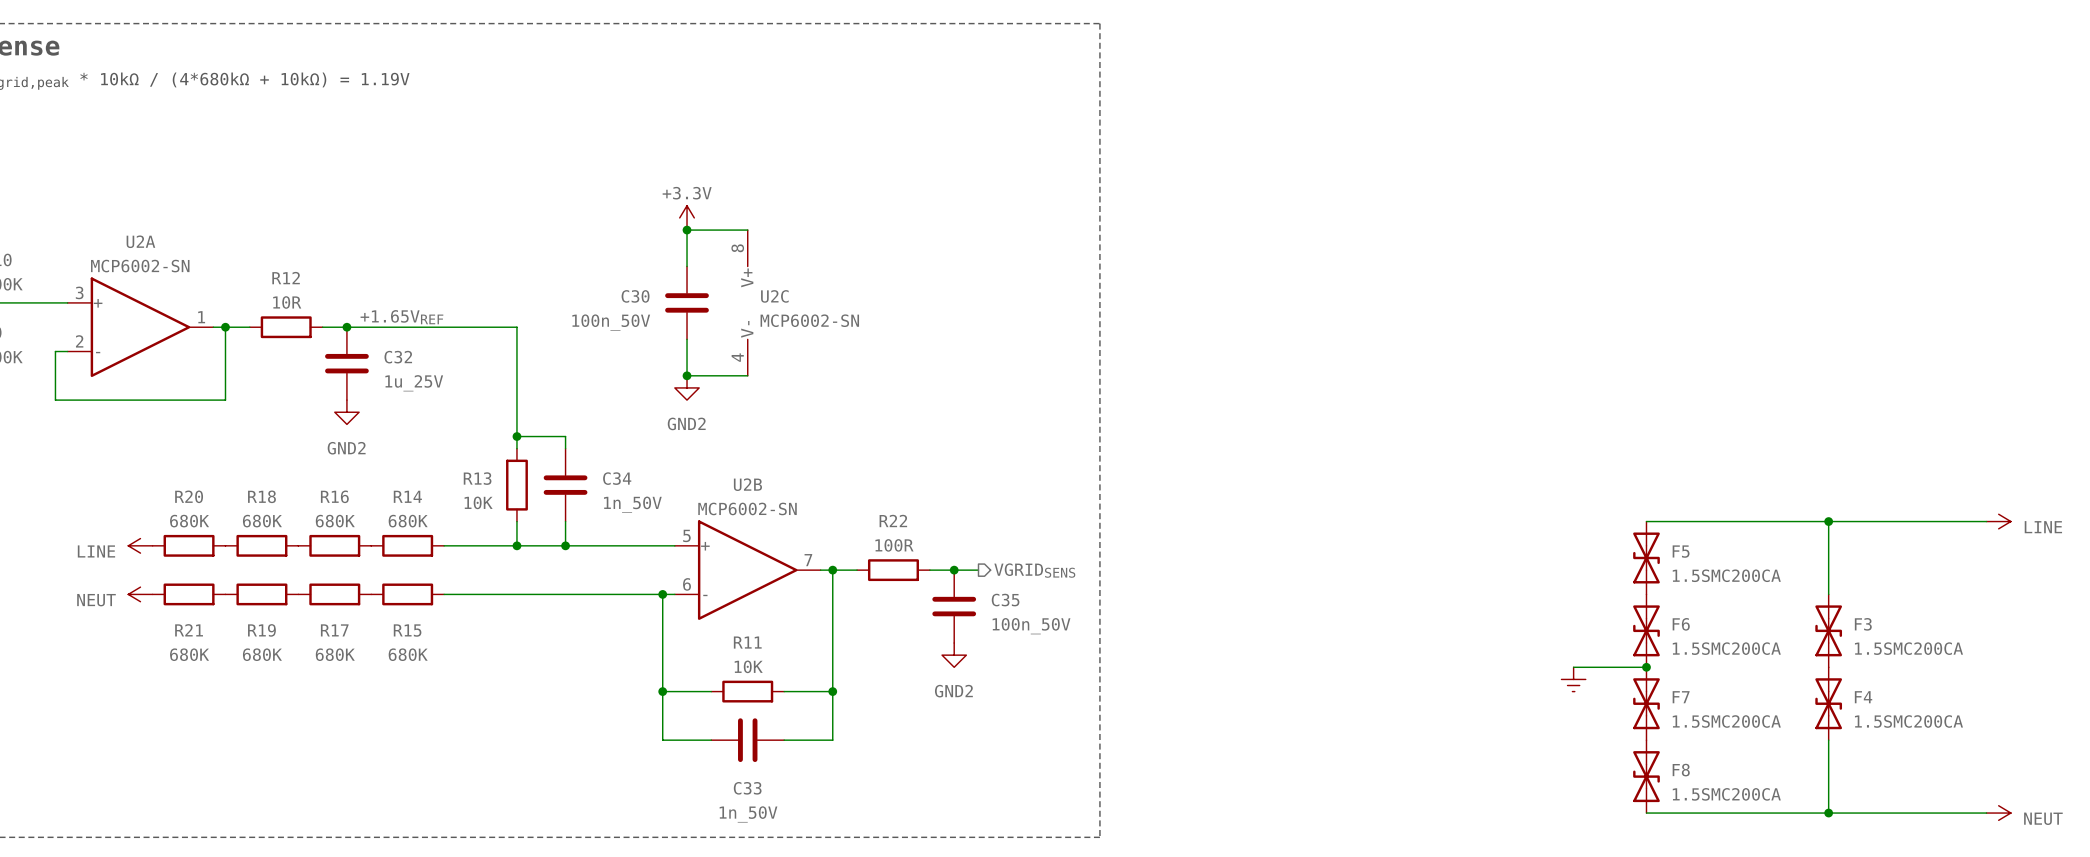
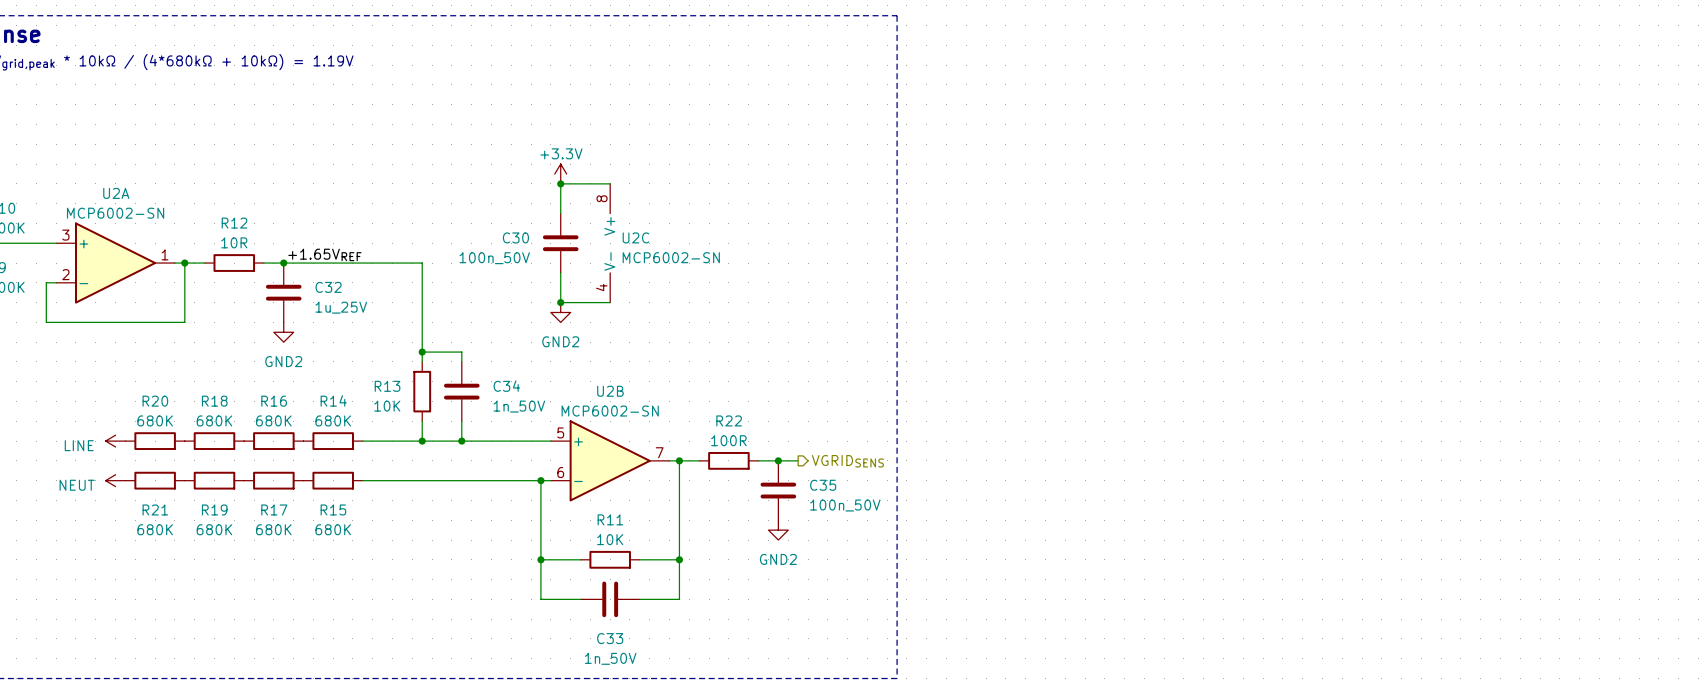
wire: (1646, 521) (1986, 521) -> none
wire: (1828, 521) (1828, 594) -> none
junction: (1828, 521) -> none
power symbol: LINE (1998, 521) -> none
F5: 1.5SMC200CA (1646, 557) -> none
F6: 1.5SMC200CA (1646, 630) -> none
F3: 1.5SMC200CA (1828, 630) -> none
wire: (1573, 667) (1646, 667) -> none
junction: (1646, 667) -> none
power symbol: (1573, 679) -> none
F7: 1.5SMC200CA (1646, 703) -> none
F4: 1.5SMC200CA (1828, 703) -> none
wire: (1828, 740) (1828, 813) -> none
F8: 1.5SMC200CA (1646, 776) -> none
wire: (1646, 813) (1986, 813) -> none
junction: (1828, 813) -> none
power symbol: NEUT (1998, 813) -> none

